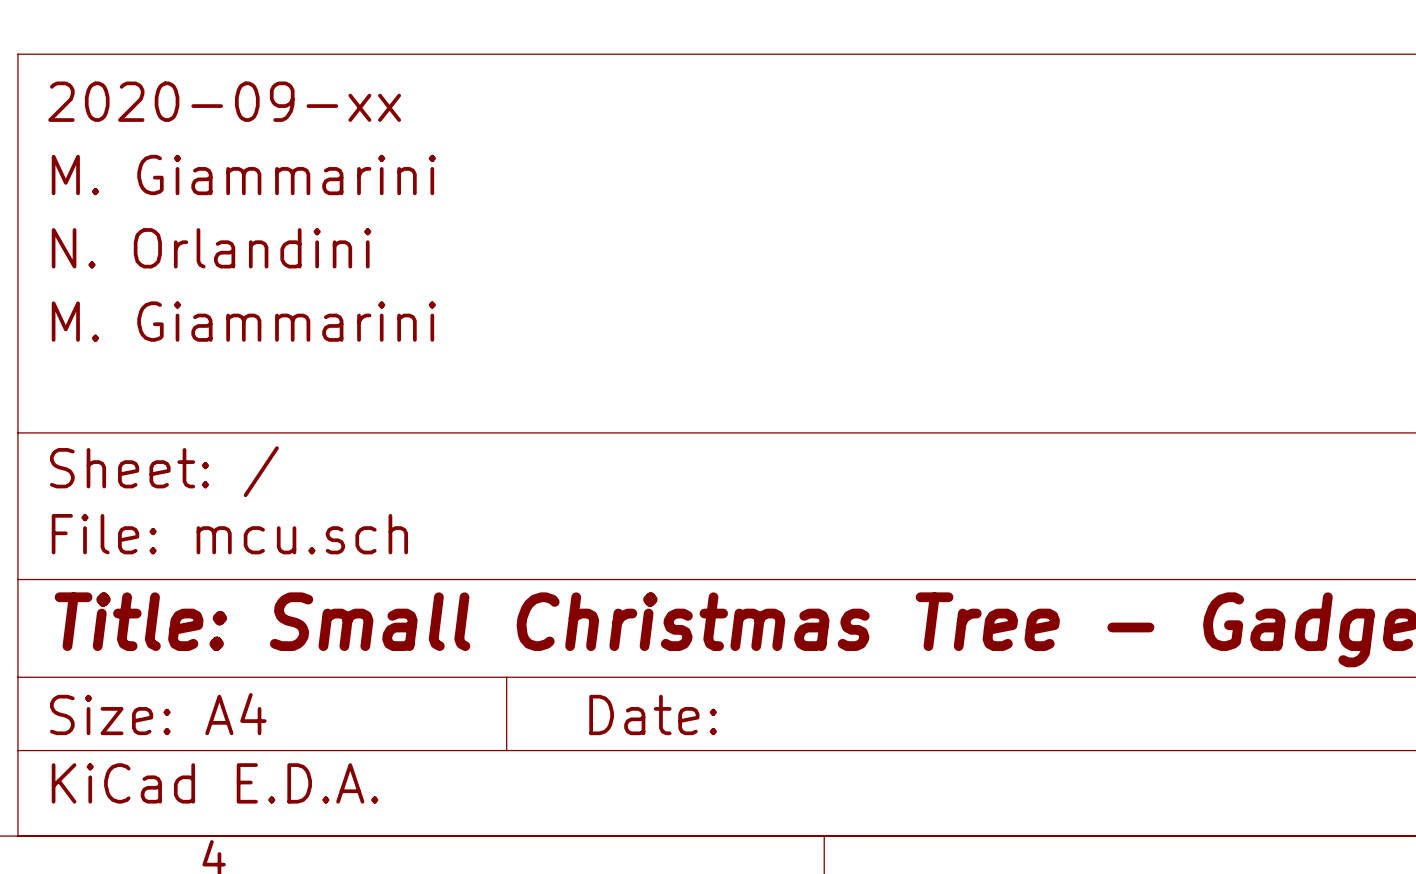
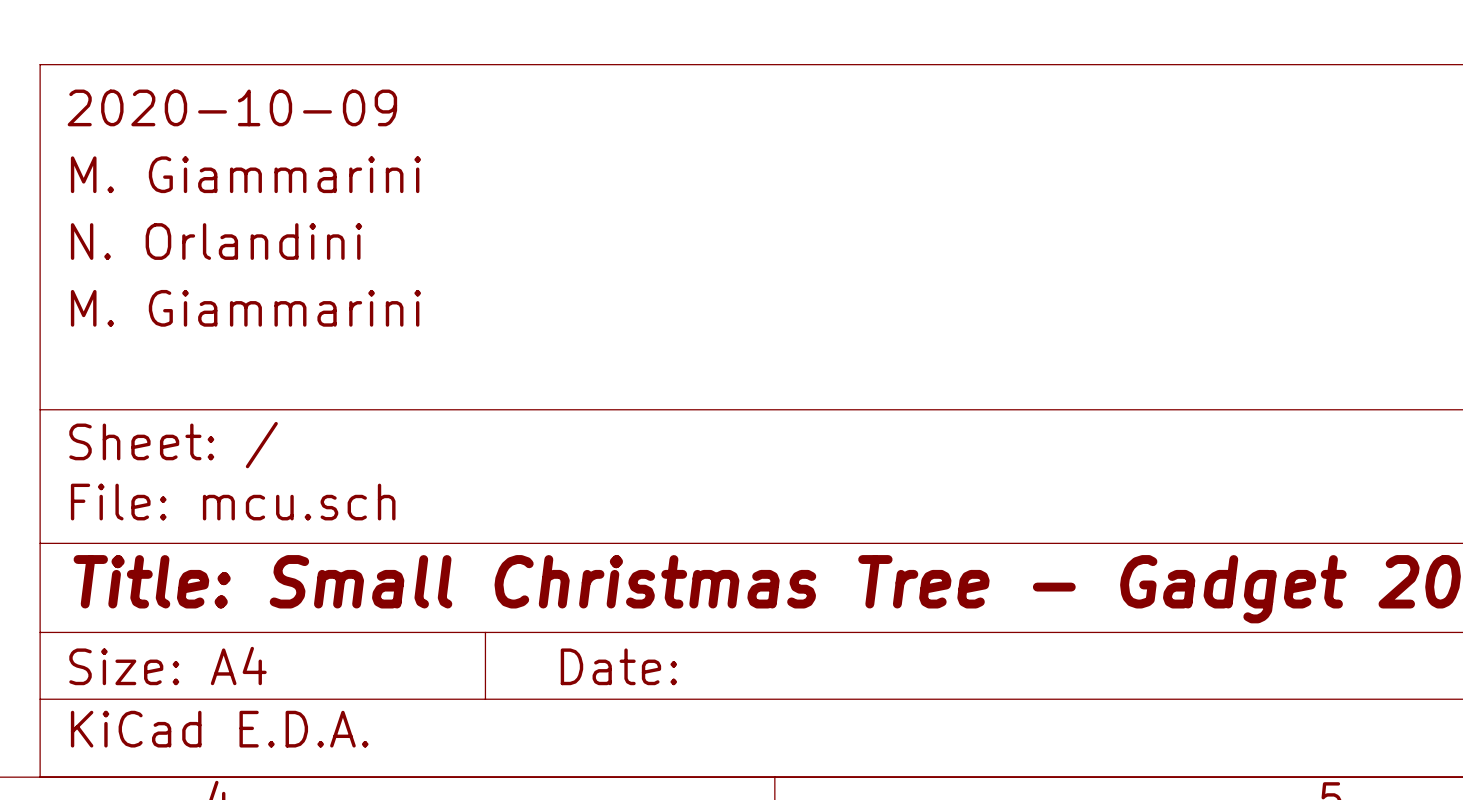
title block: 2020-09-xx (224, 101) -> 2020-10-09 (232, 107)

